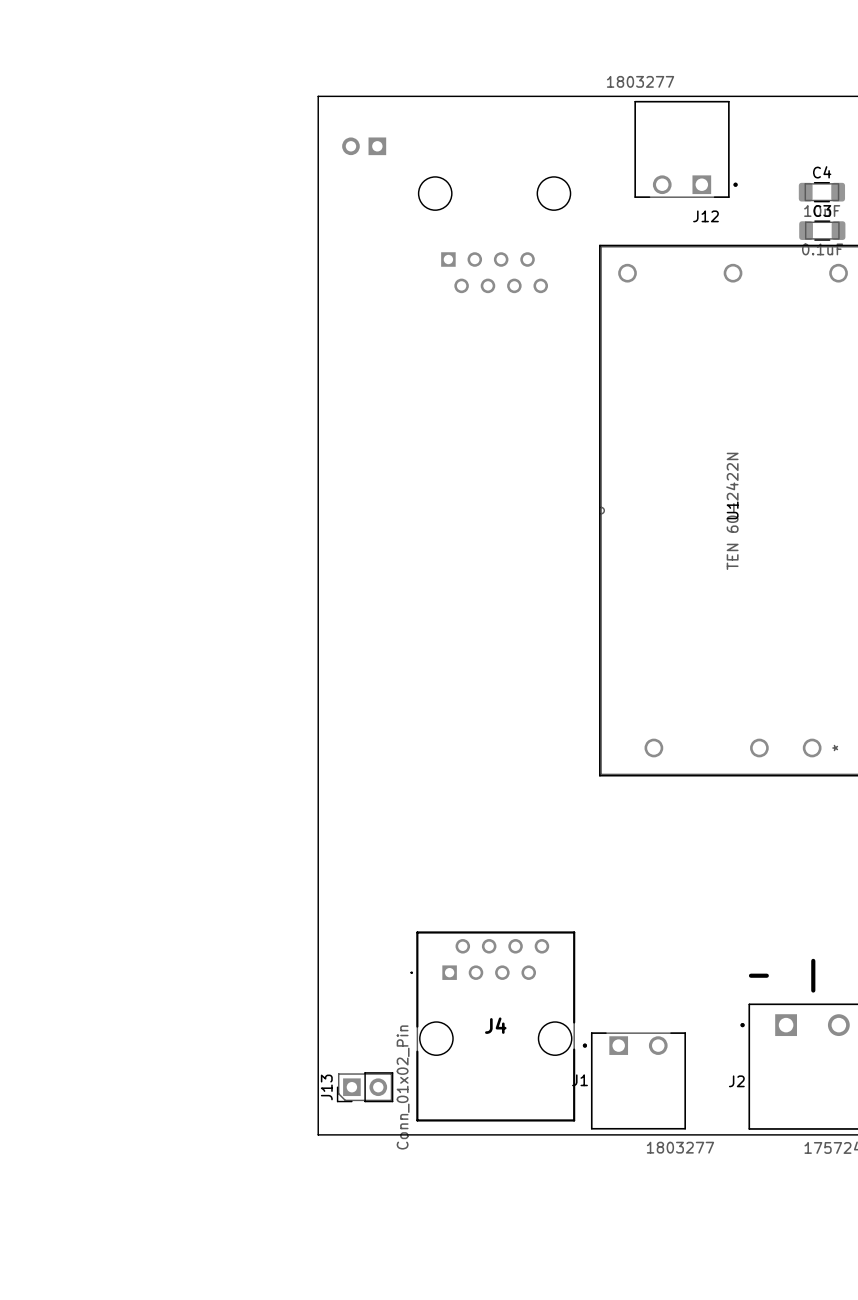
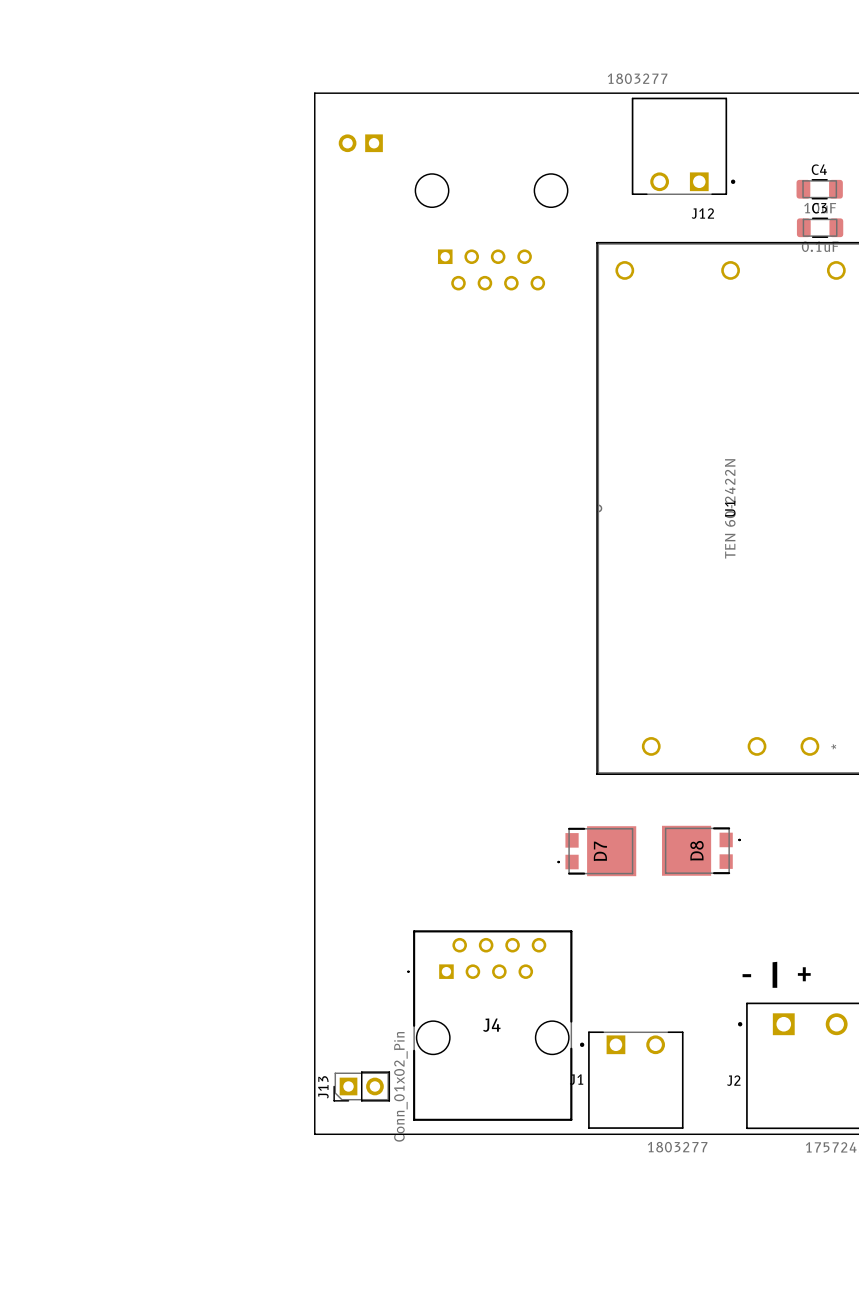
D7: none -> (596, 851)
D8: none -> (701, 850)

